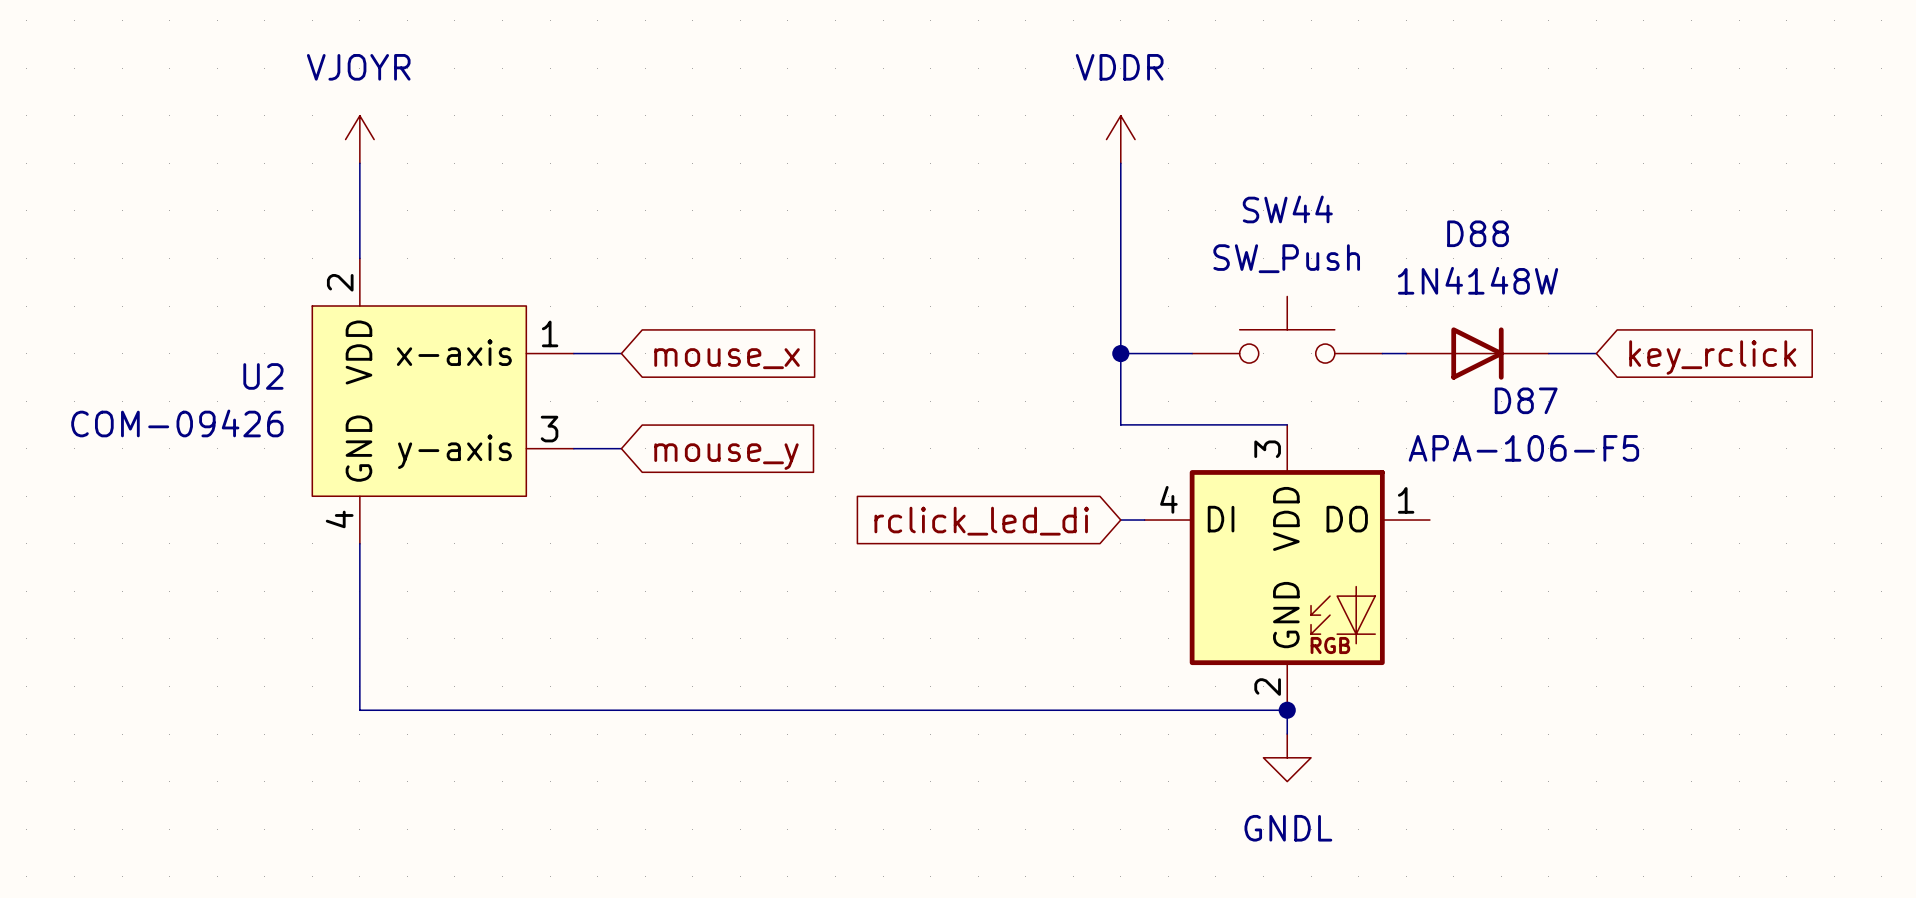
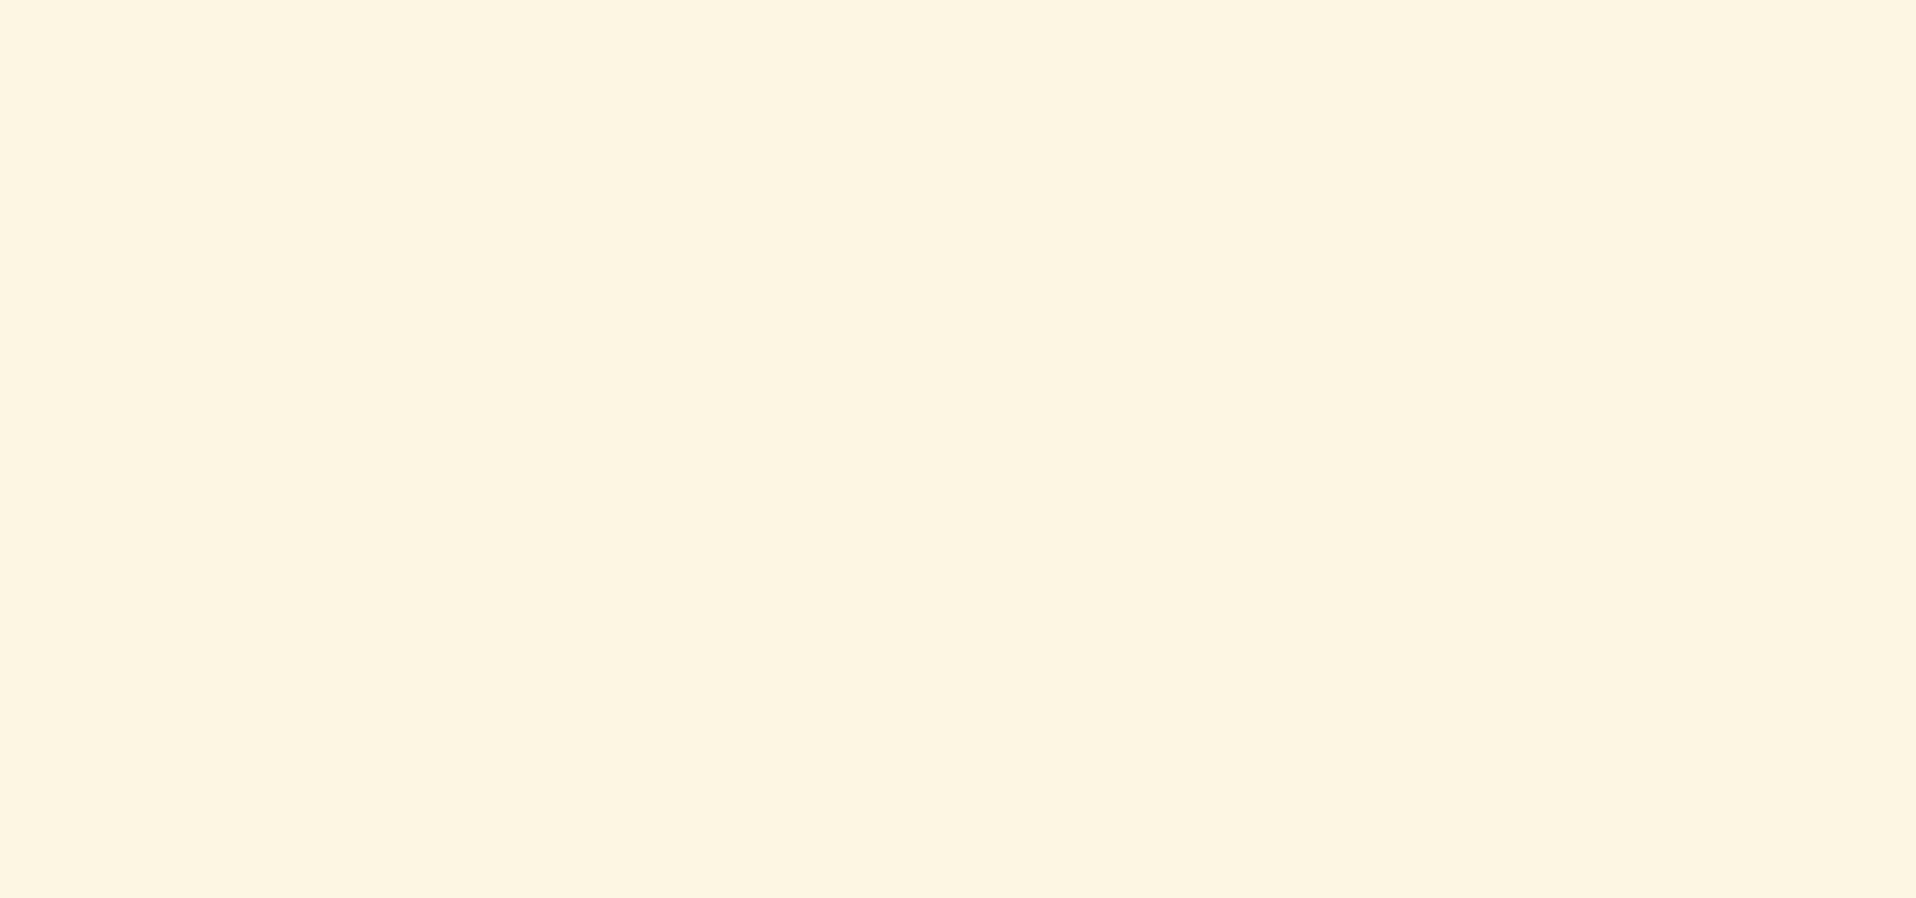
power symbol: VJOYR (359, 139) -> none
power symbol: VDDR (1120, 139) -> none
wire: (359, 163) (359, 258) -> none
wire: (1120, 163) (1120, 424) (1287, 424) -> none
SW44: SW_Push (1287, 329) -> none
wire: (573, 353) (621, 353) -> none
wire: (1120, 353) (1192, 353) -> none
junction: (1120, 353) -> none
wire: (1382, 353) (1406, 353) -> none
D88: 1N4148W (1477, 353) -> none
wire: (1548, 353) (1596, 353) -> none
global label: key_rclick (1712, 357) -> none
global label: mouse_x (727, 358) -> none
U2: COM-09426 (443, 401) -> none
wire: (573, 448) (621, 448) -> none
global label: mouse_y (726, 456) -> none
wire: (1120, 520) (1144, 520) -> none
global label: rclick_led_di (981, 521) -> none
wire: (359, 543) (359, 710) (1287, 710) (1287, 734) -> none
D87: APA-106-F5 (1287, 567) -> none
junction: (1287, 710) -> none
power symbol: GNDL (1287, 757) -> none

